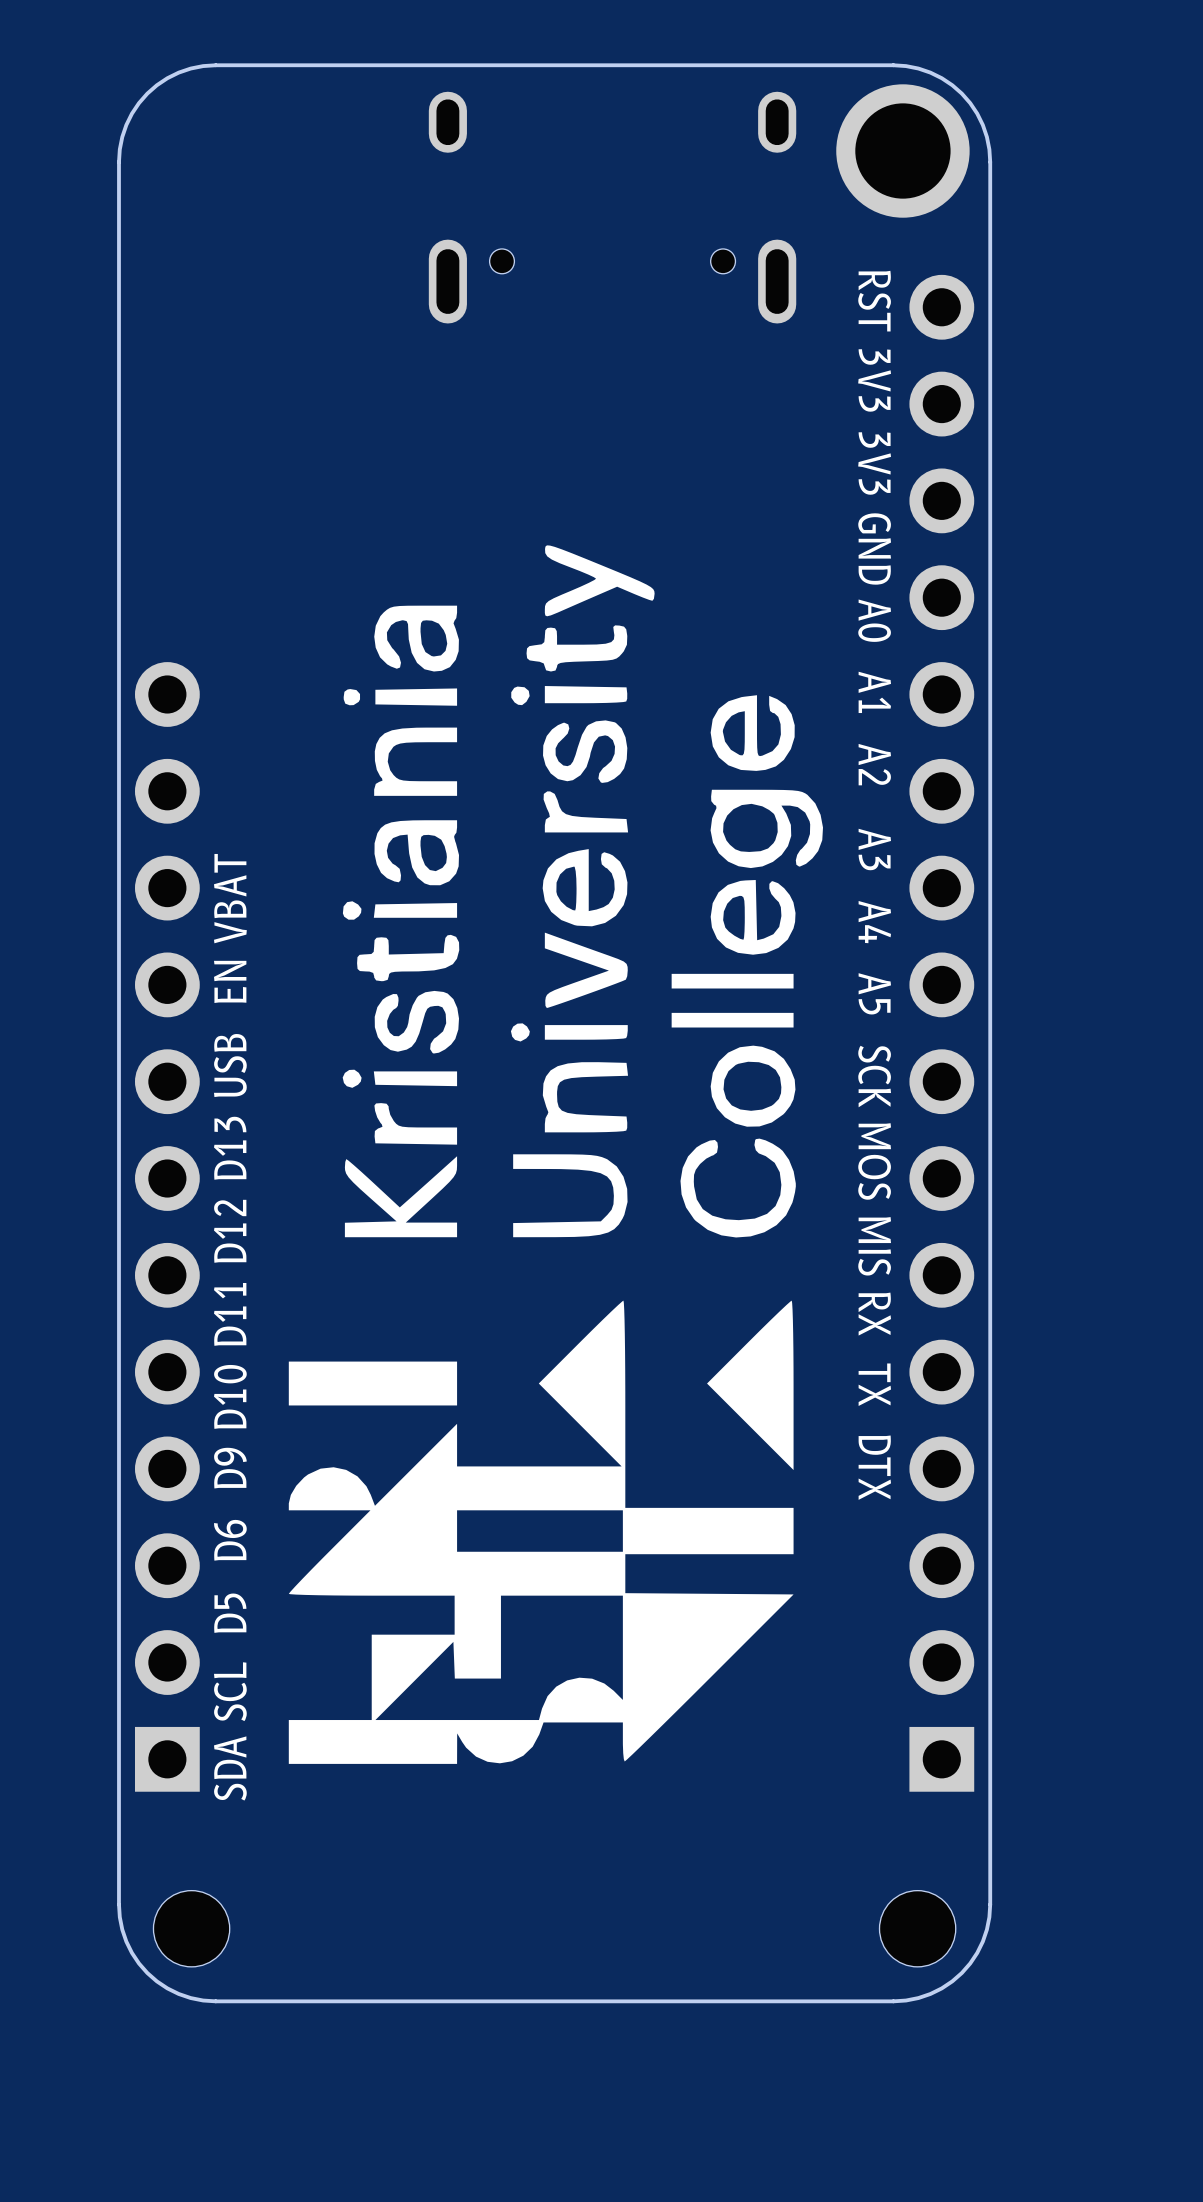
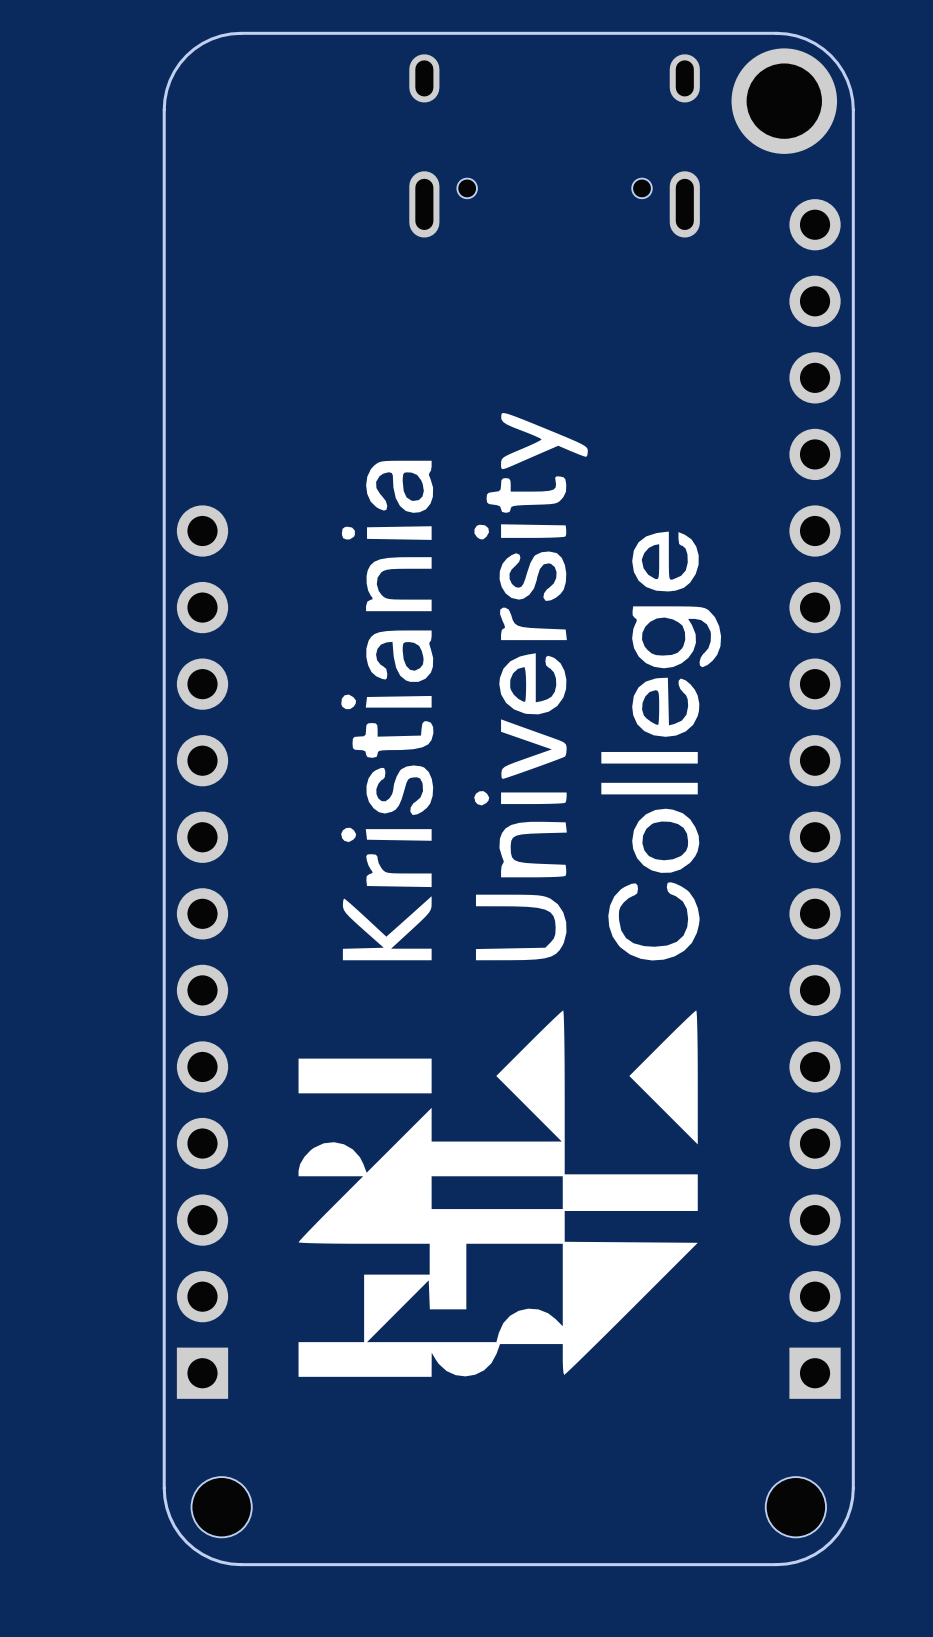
text: RST 3V3 3V3 GND A0 A1 A2 A3 A4 A5 SCK MOS MIS RX TX DTX (874, 885) -> none
text: SDA SCL D5 D6 D9 D10 D11 D12 D13 USB EN VBAT (230, 1327) -> none

